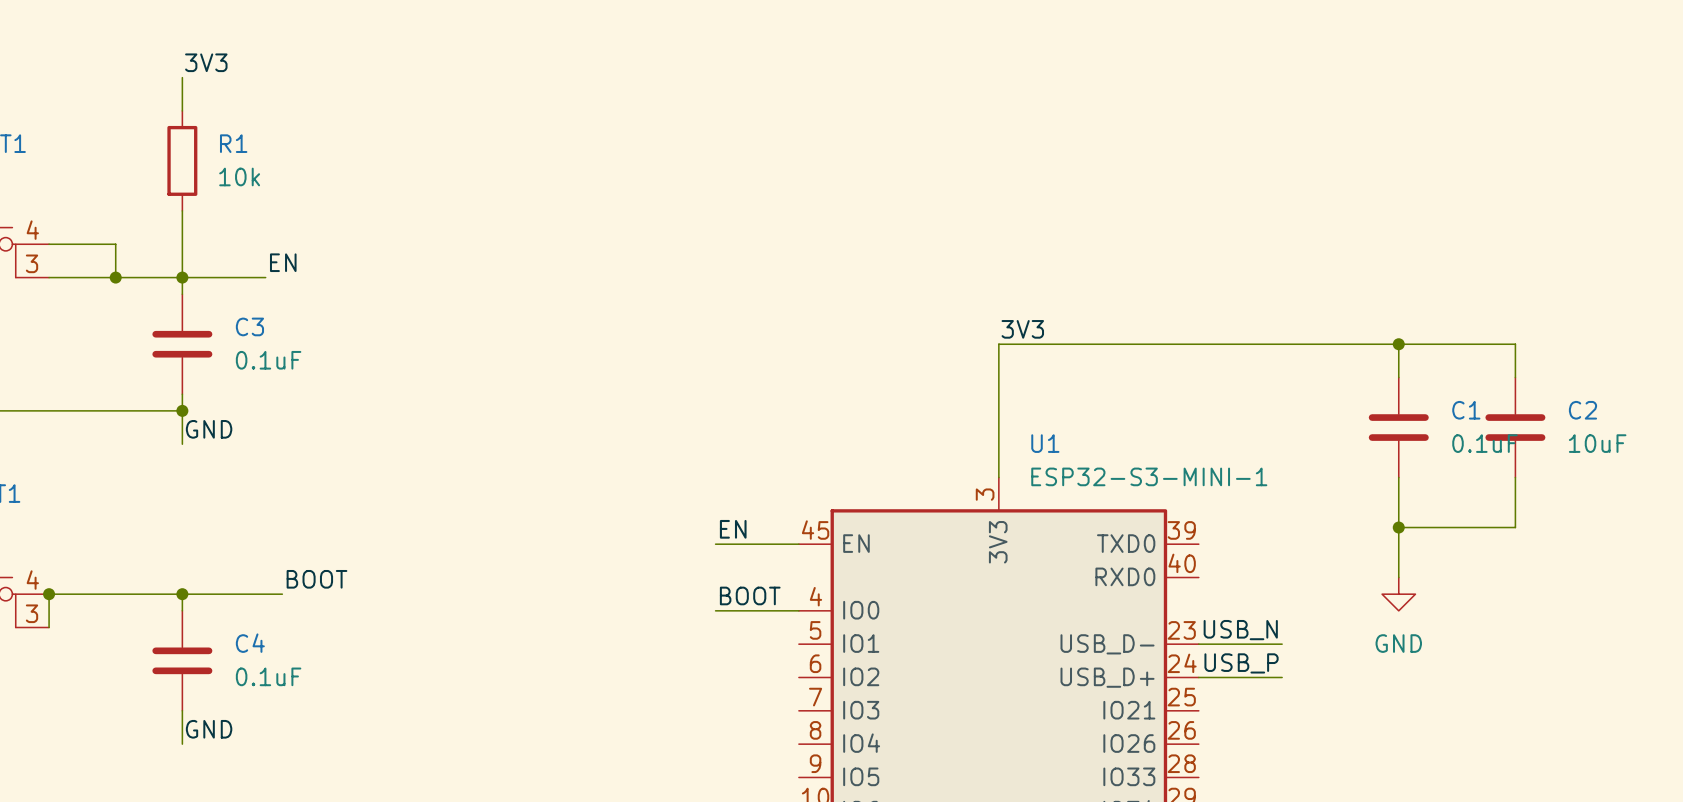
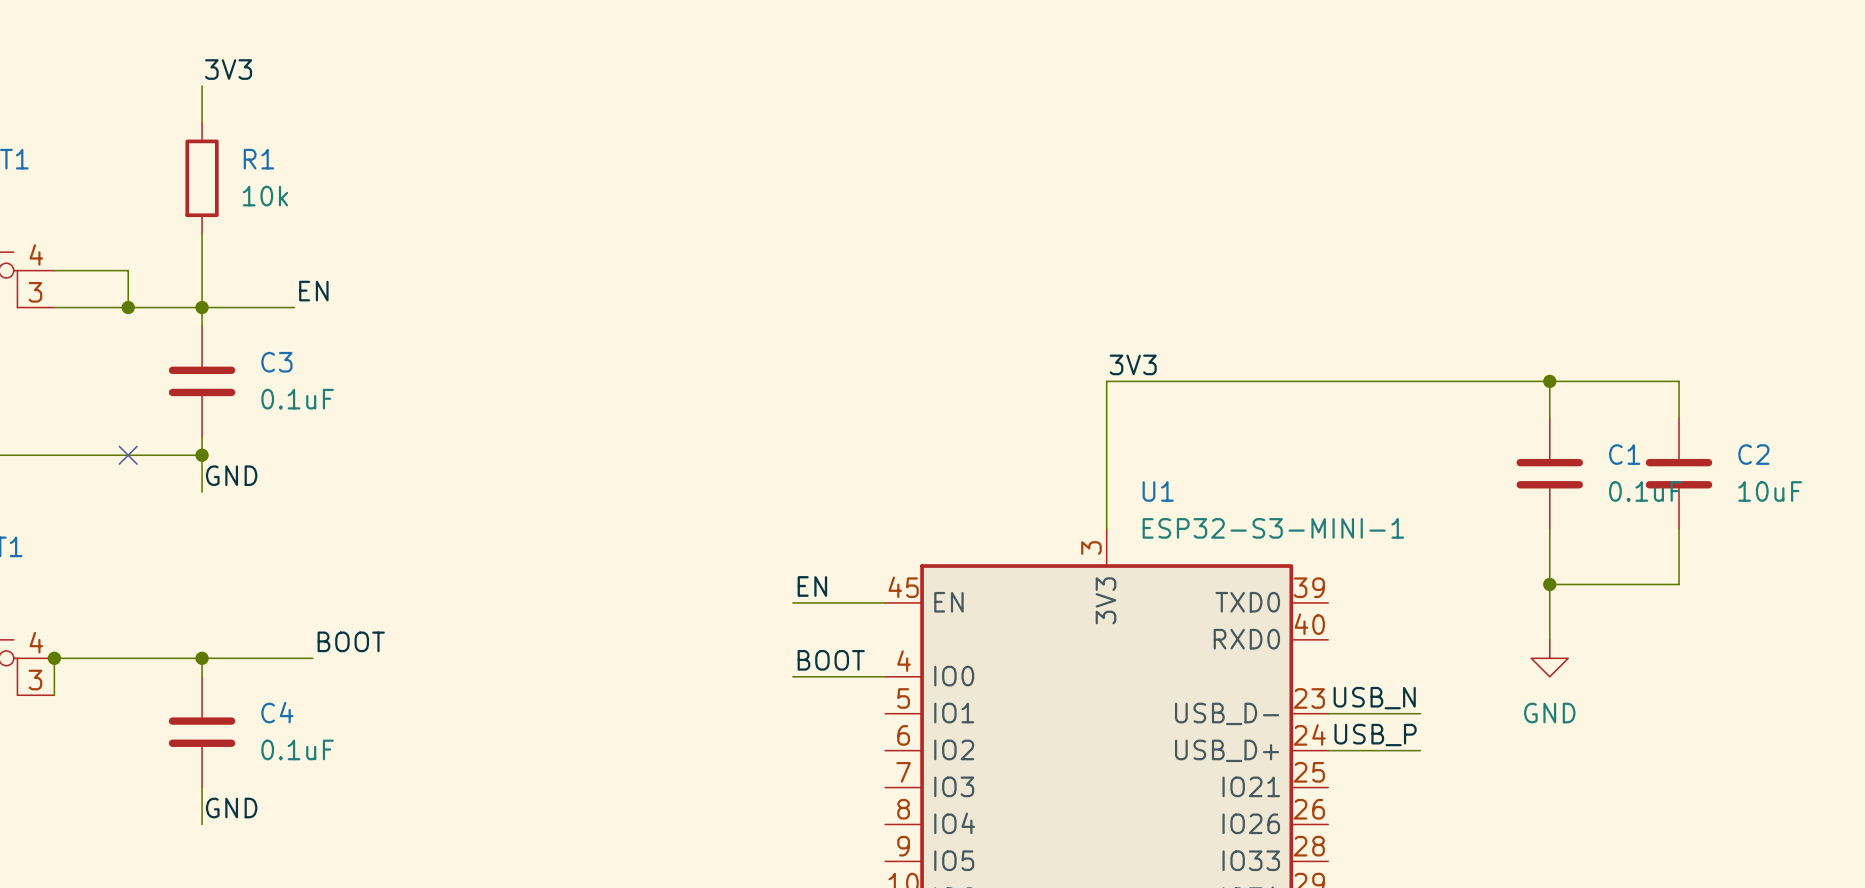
no-connect mark: none -> (128, 455)

